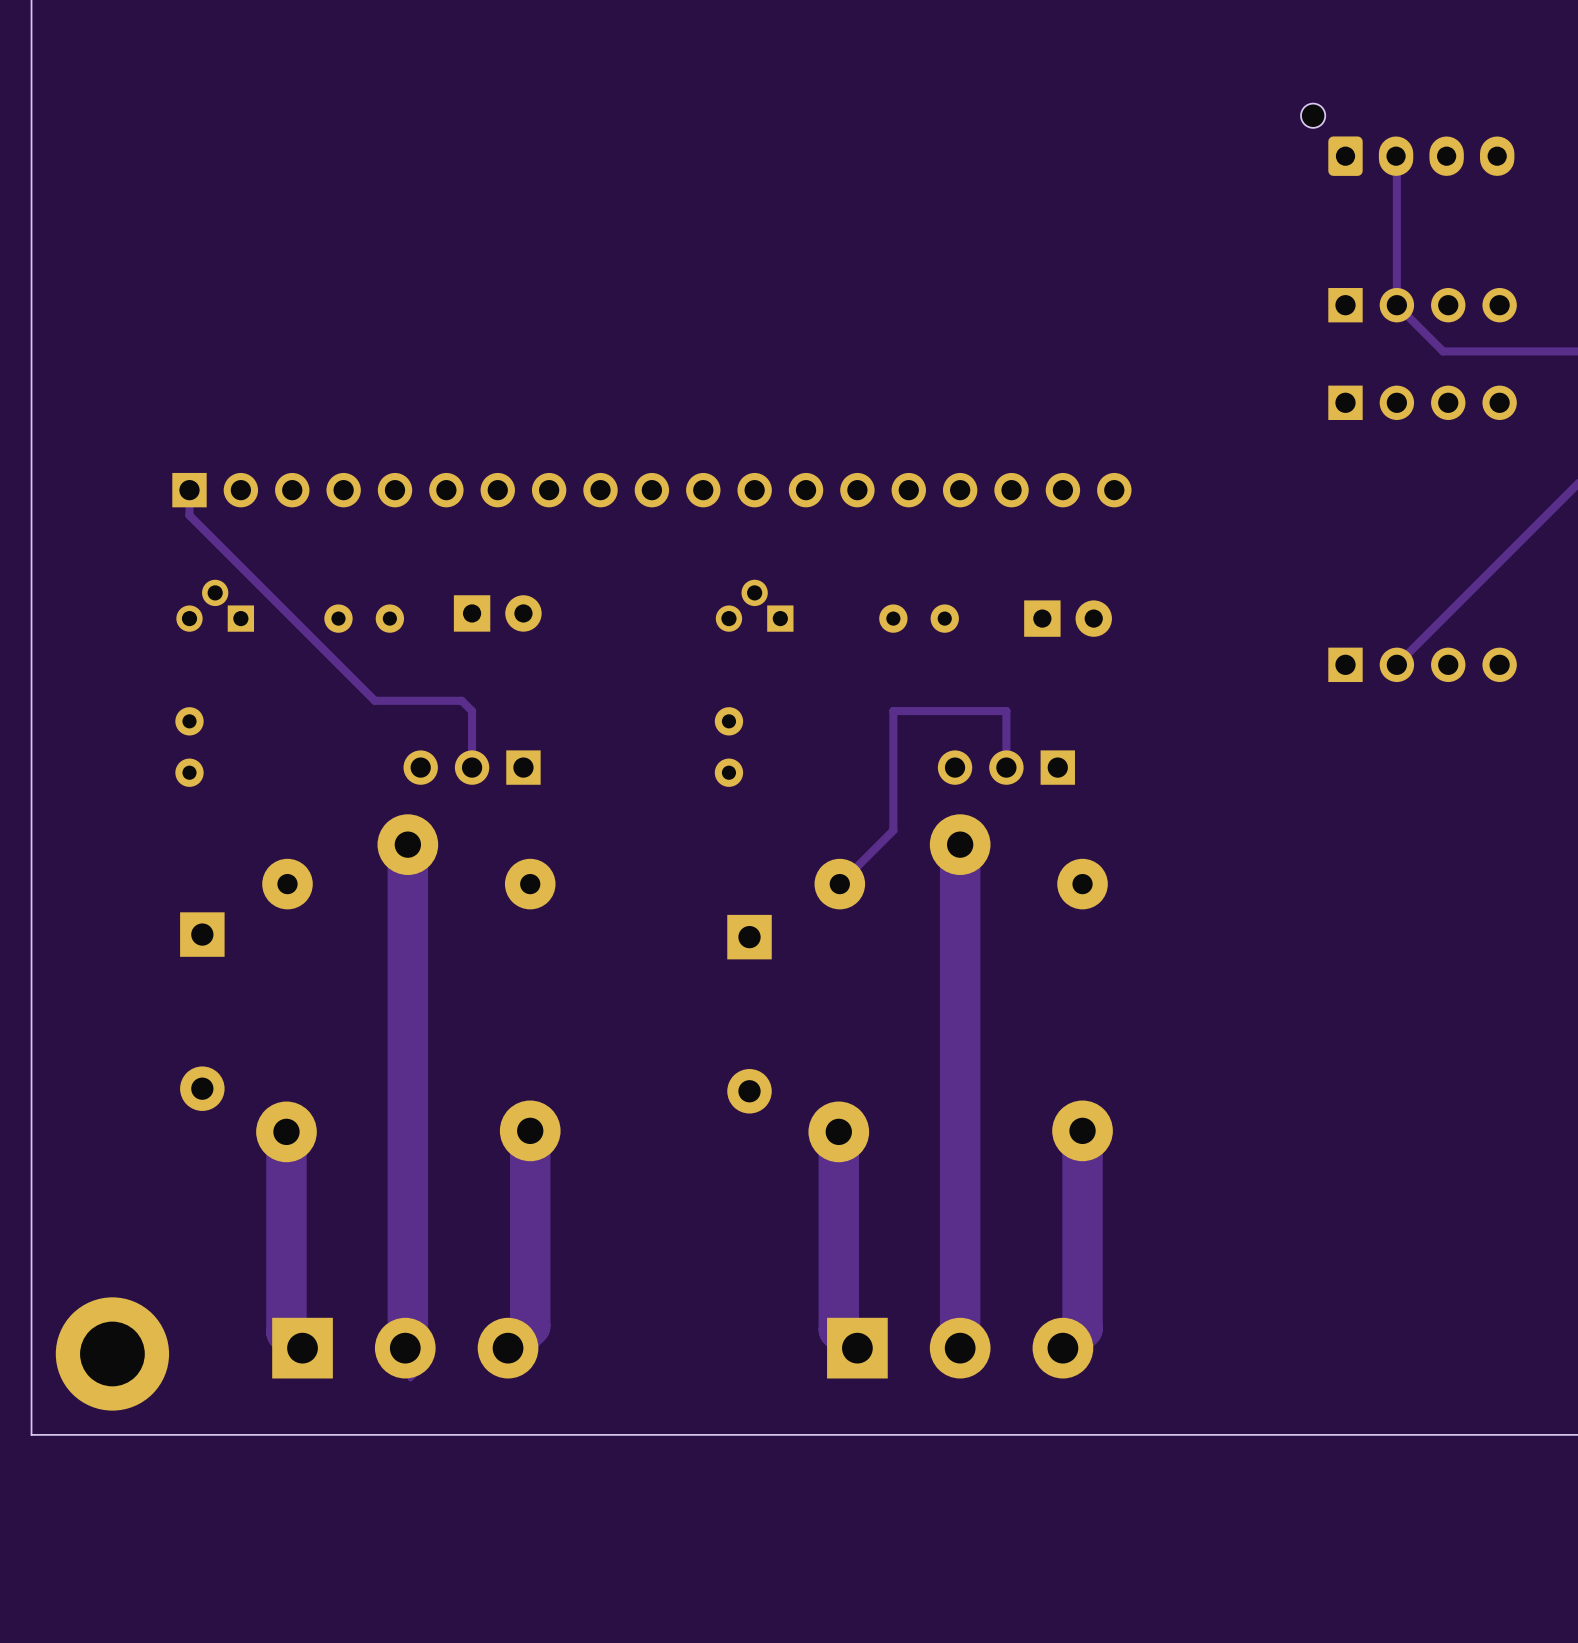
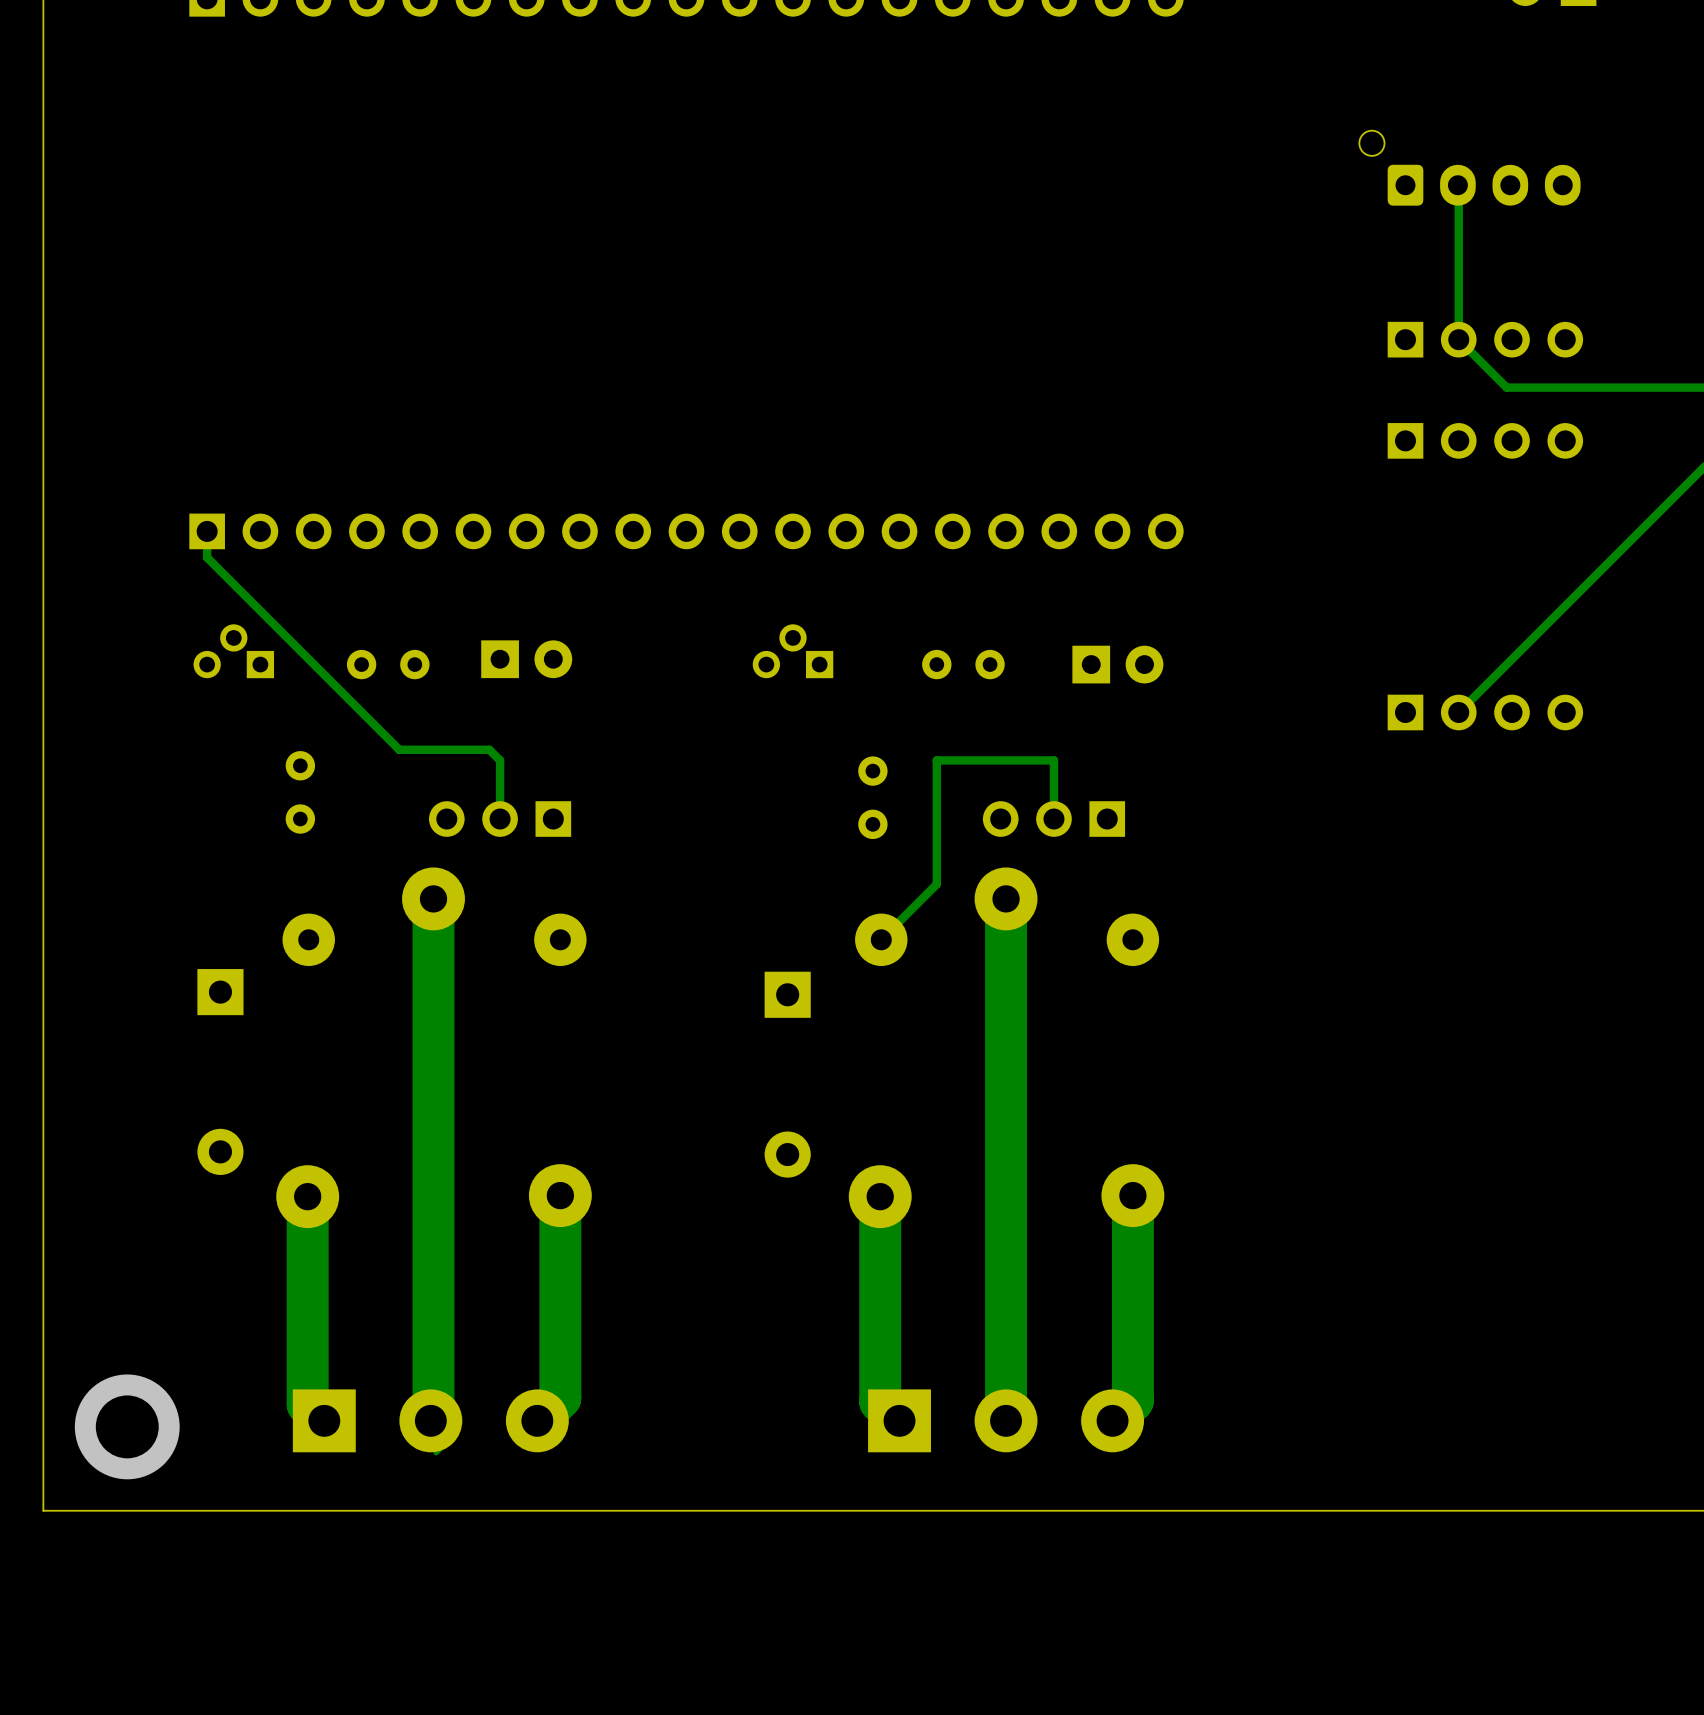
part position: (189, 747) -> (300, 792)
part position: (728, 747) -> (872, 797)
part: (112, 1353) -> none
via: none -> (127, 1426)

